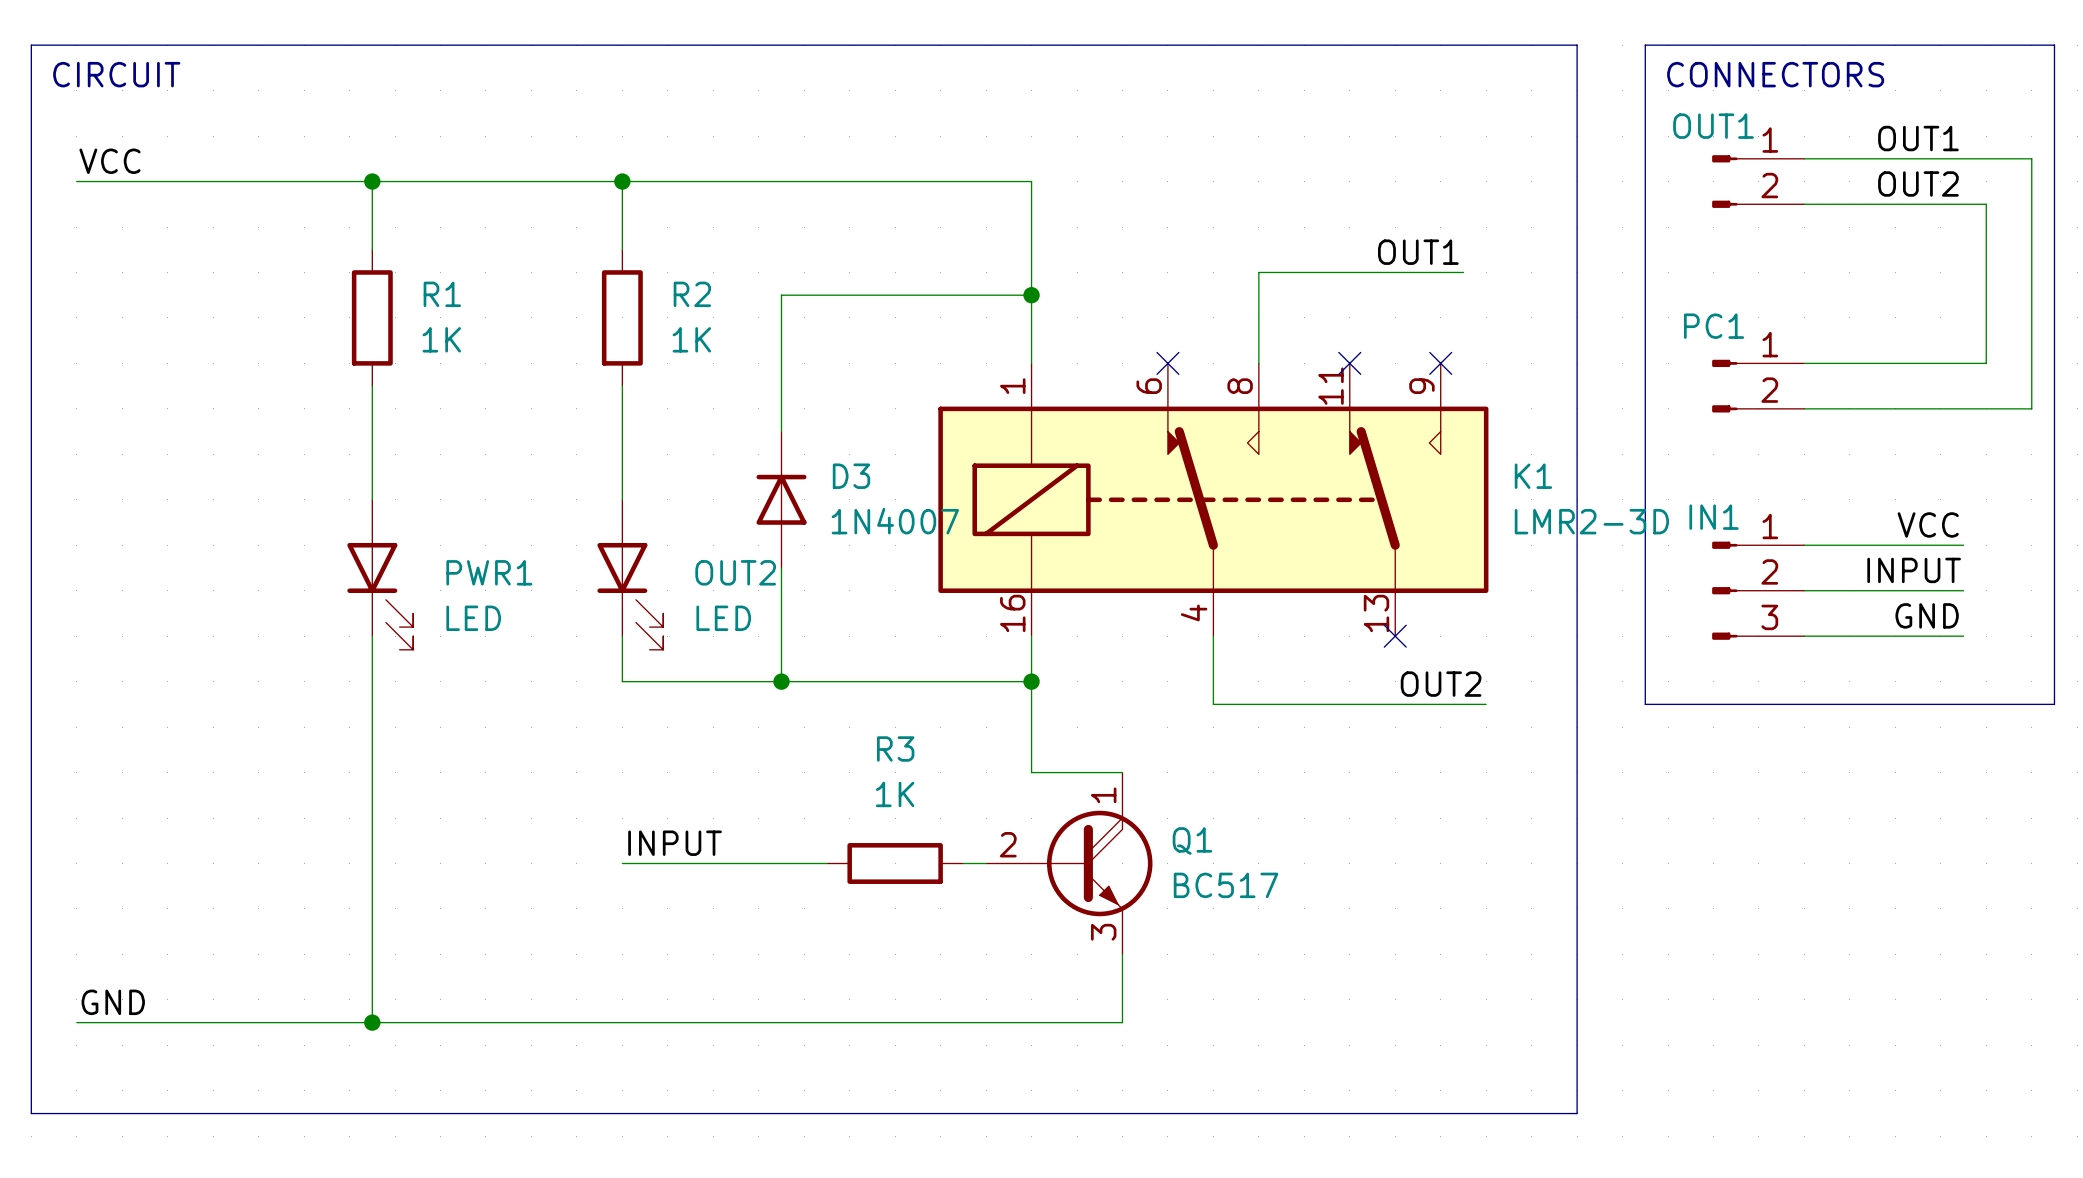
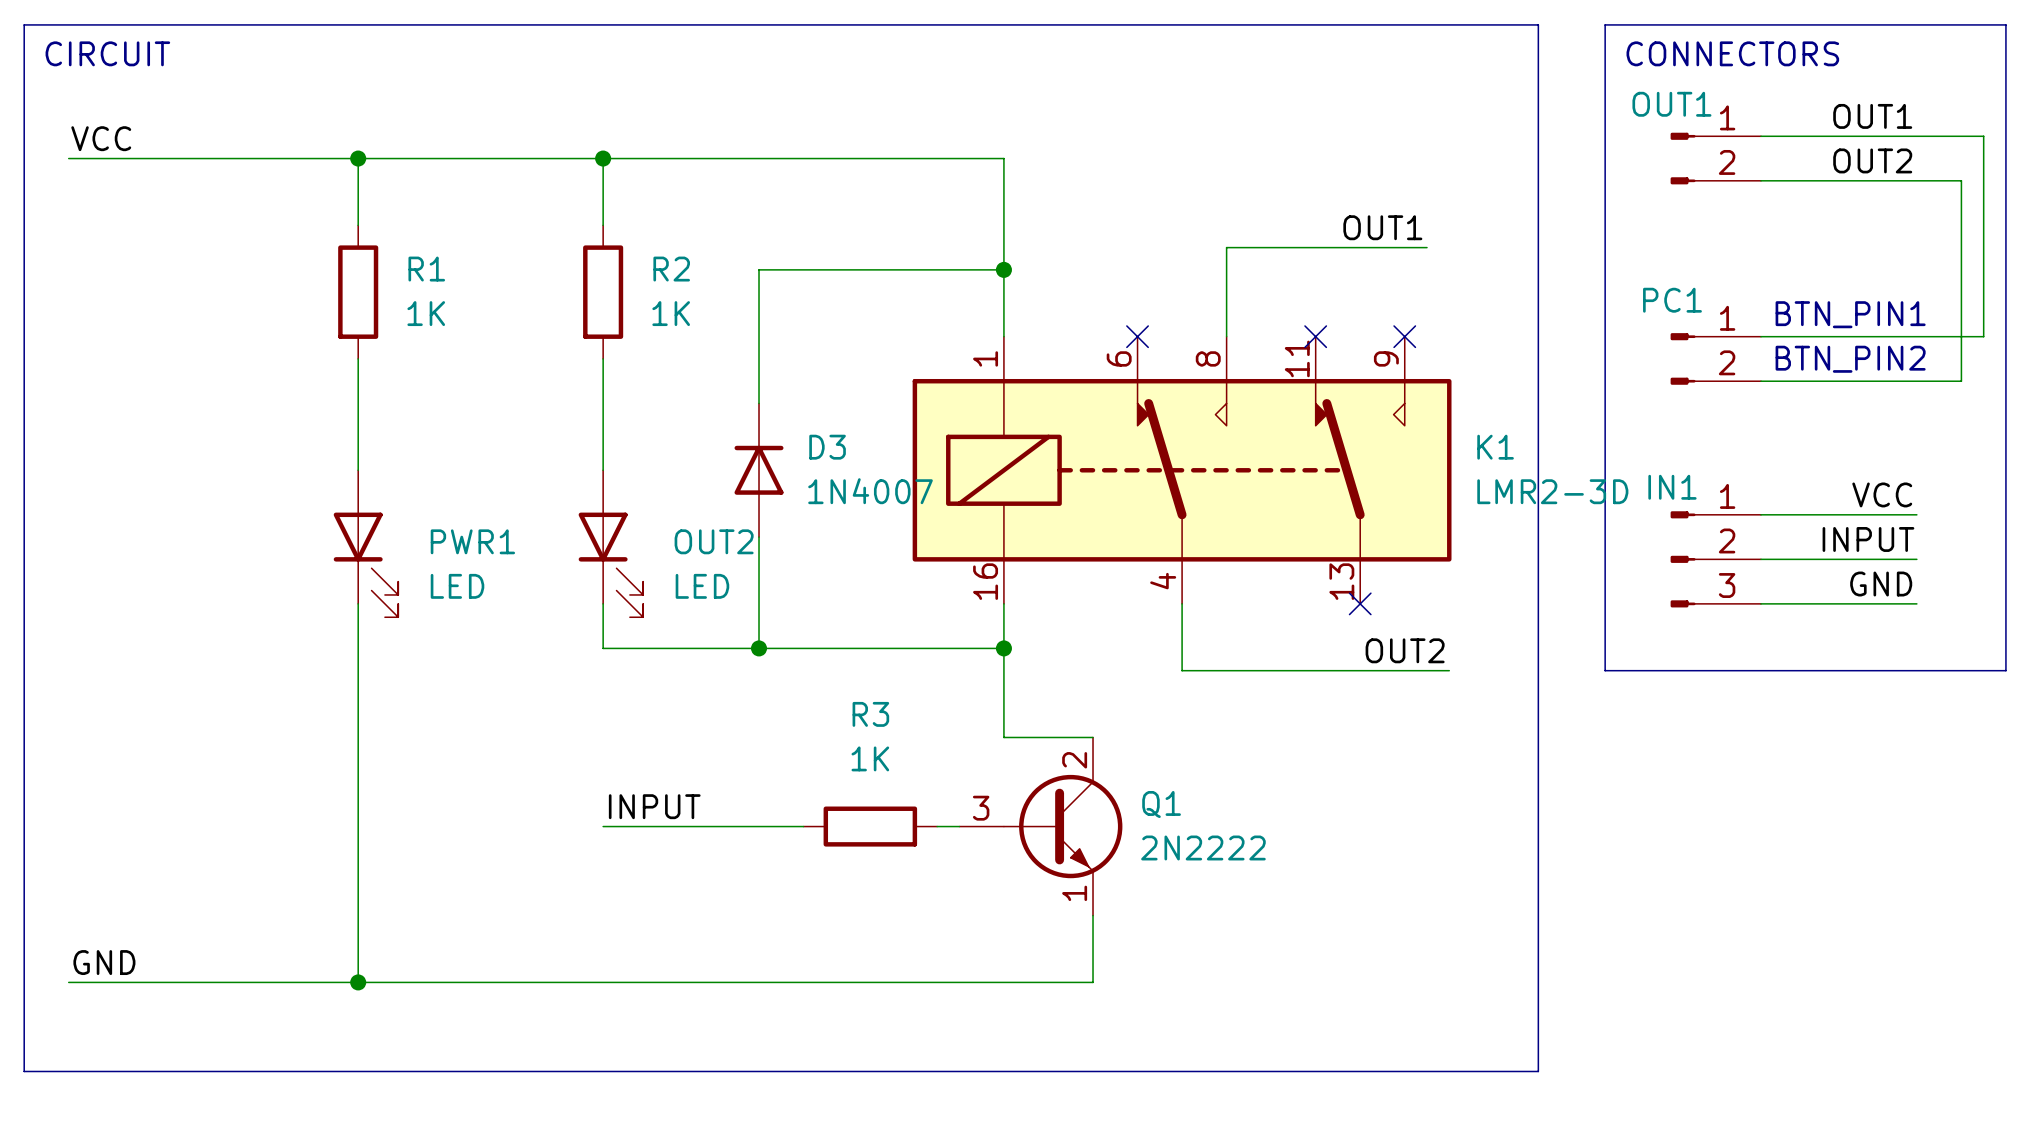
wire: (1986, 204) (1986, 363) -> (1939, 180) (1961, 180) (1961, 381)
text: none -> BTN_PIN1 (1850, 314)
wire: (2031, 363) (2031, 408) (2009, 408) -> (1983, 336) (1939, 336)
text: none -> BTN_PIN2 (1850, 359)
Q1 symbol: [986, 772, 1153, 955] -> [959, 737, 1123, 916]
Q1 value: BC517 (1226, 885) -> 2N2222 (1203, 847)

